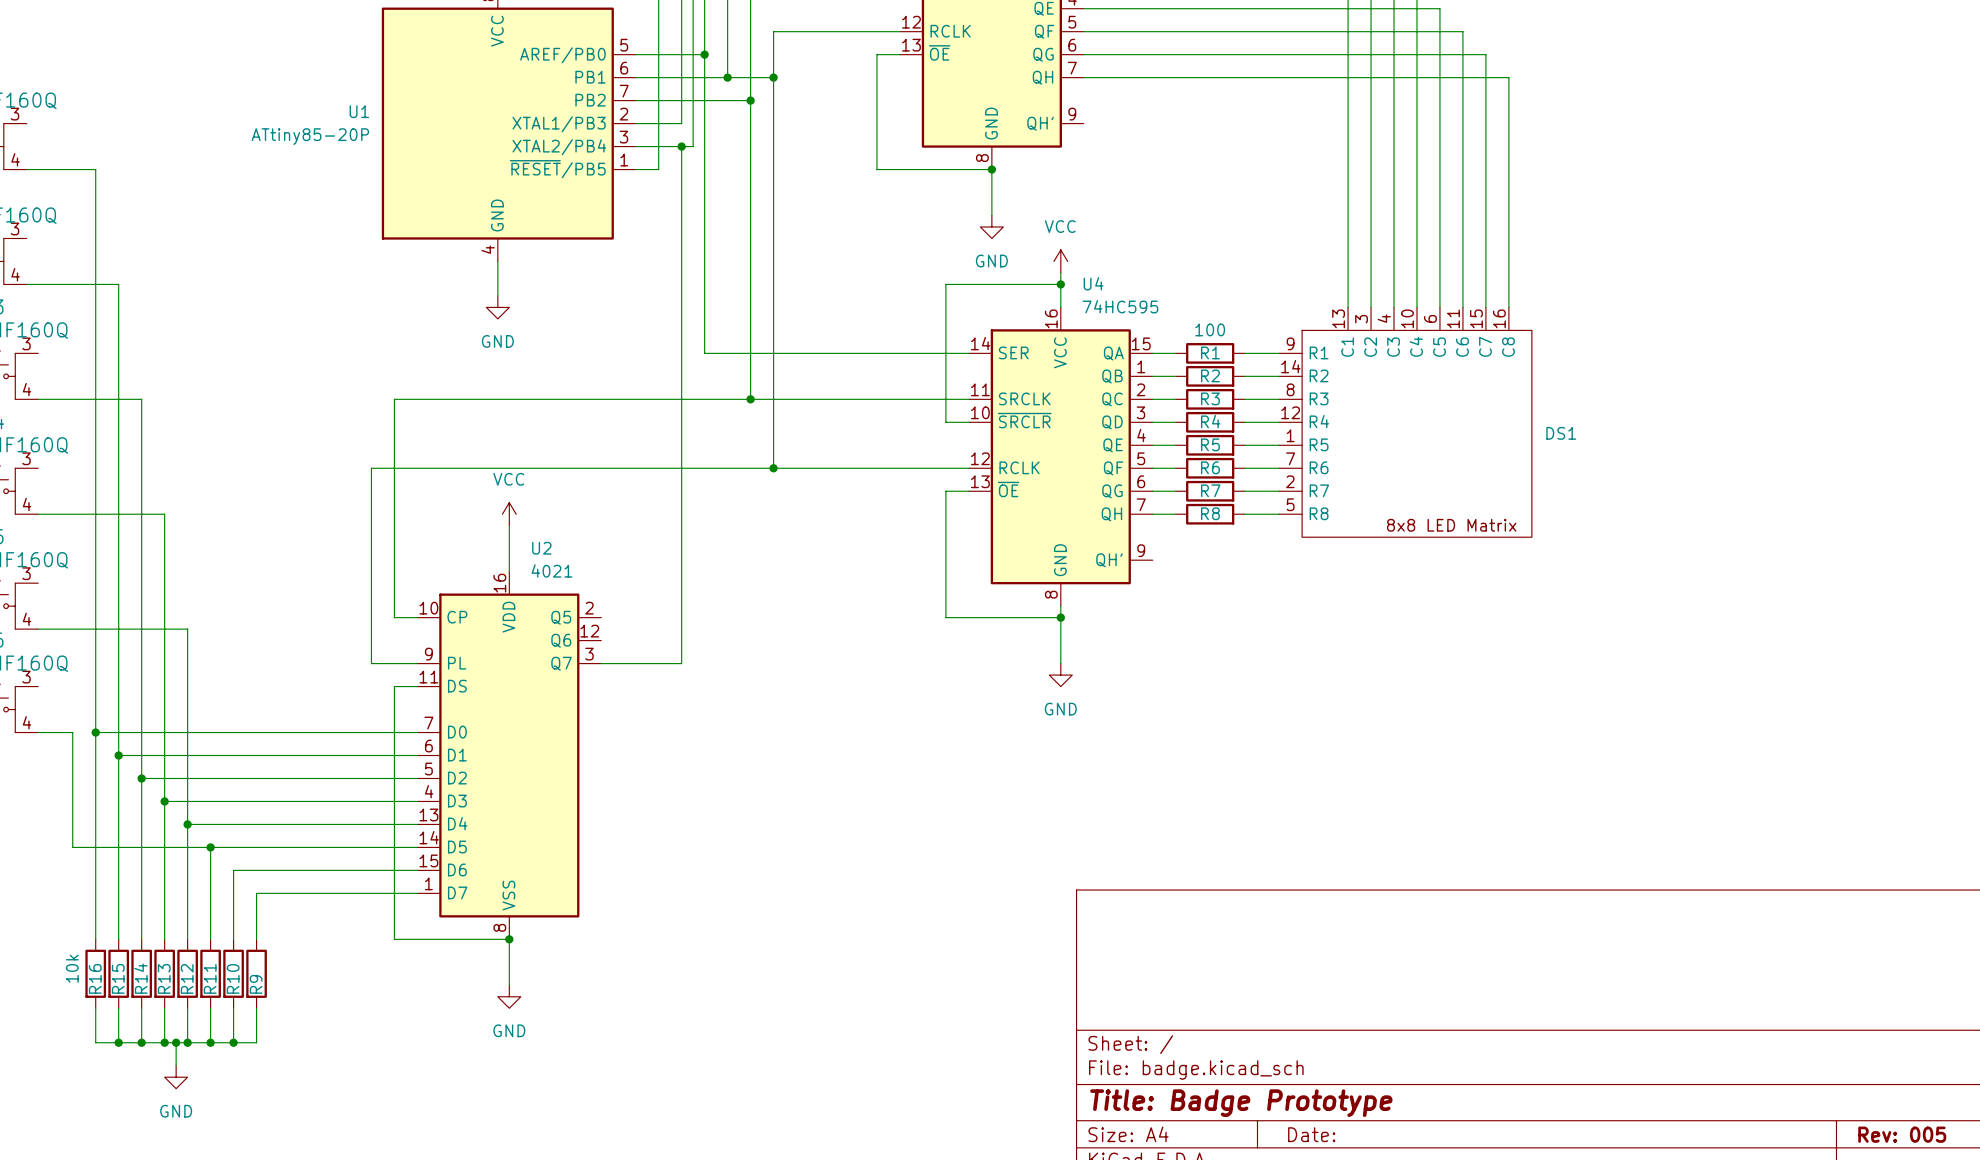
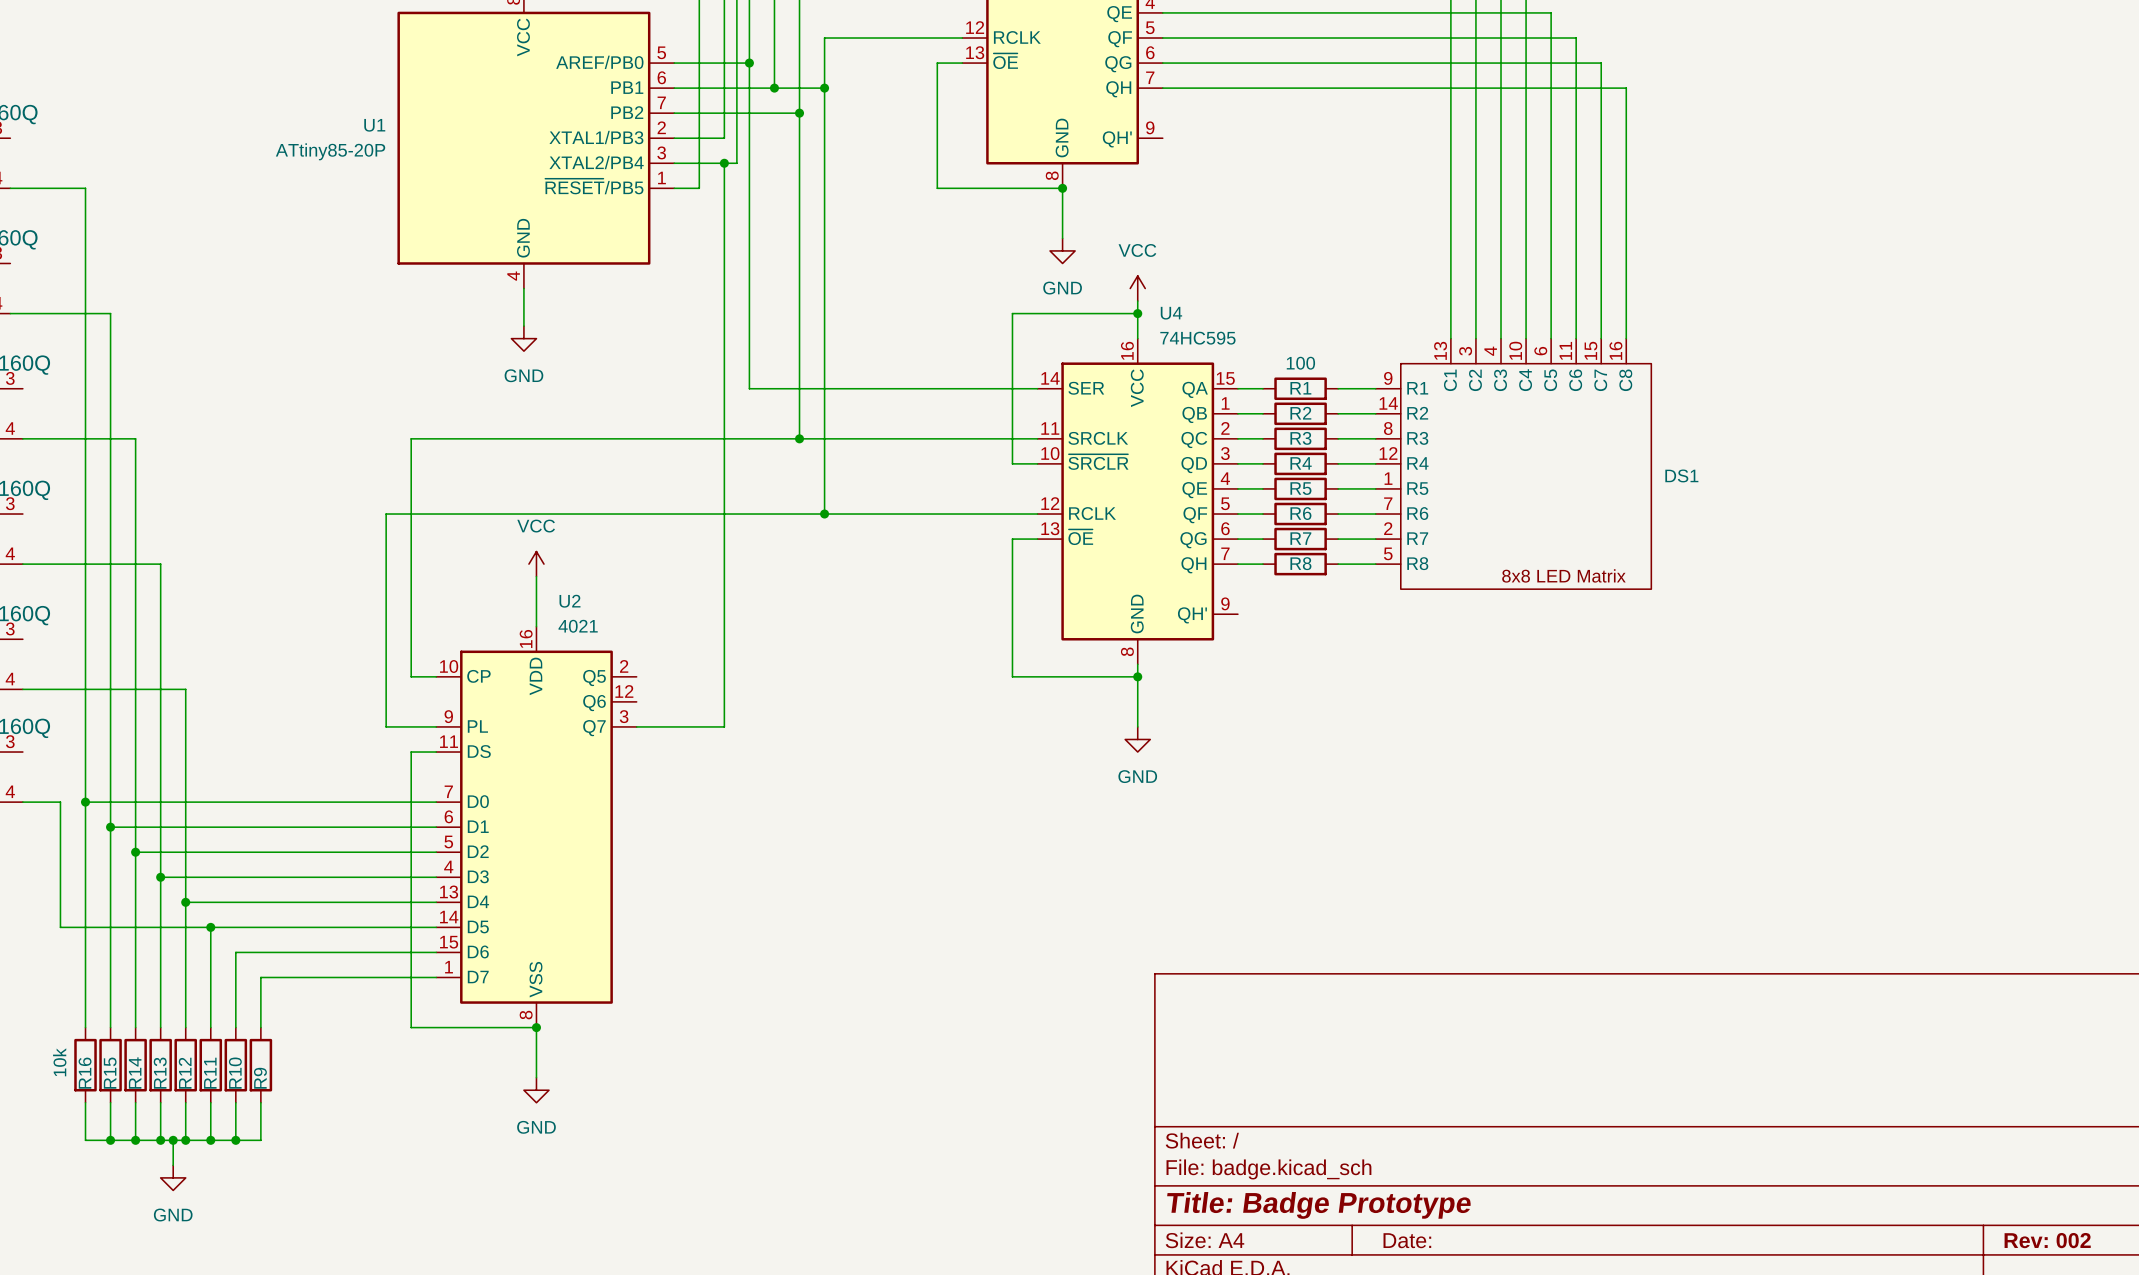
title block: Rev: 005 (1902, 1134) -> Rev: 002 (2047, 1240)

